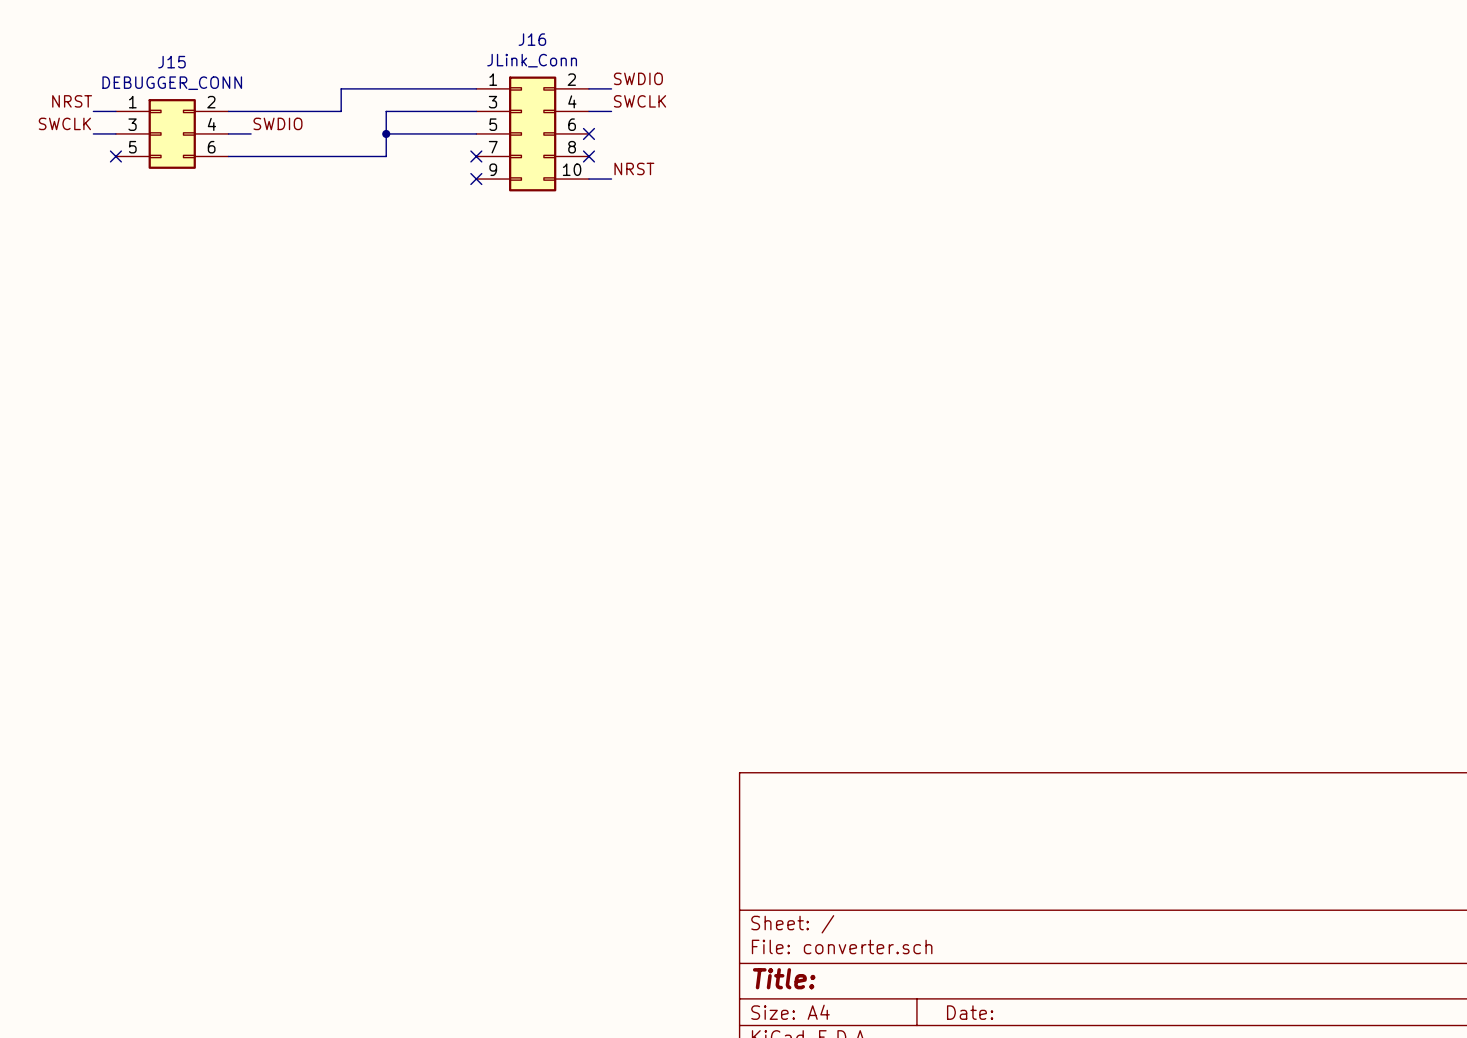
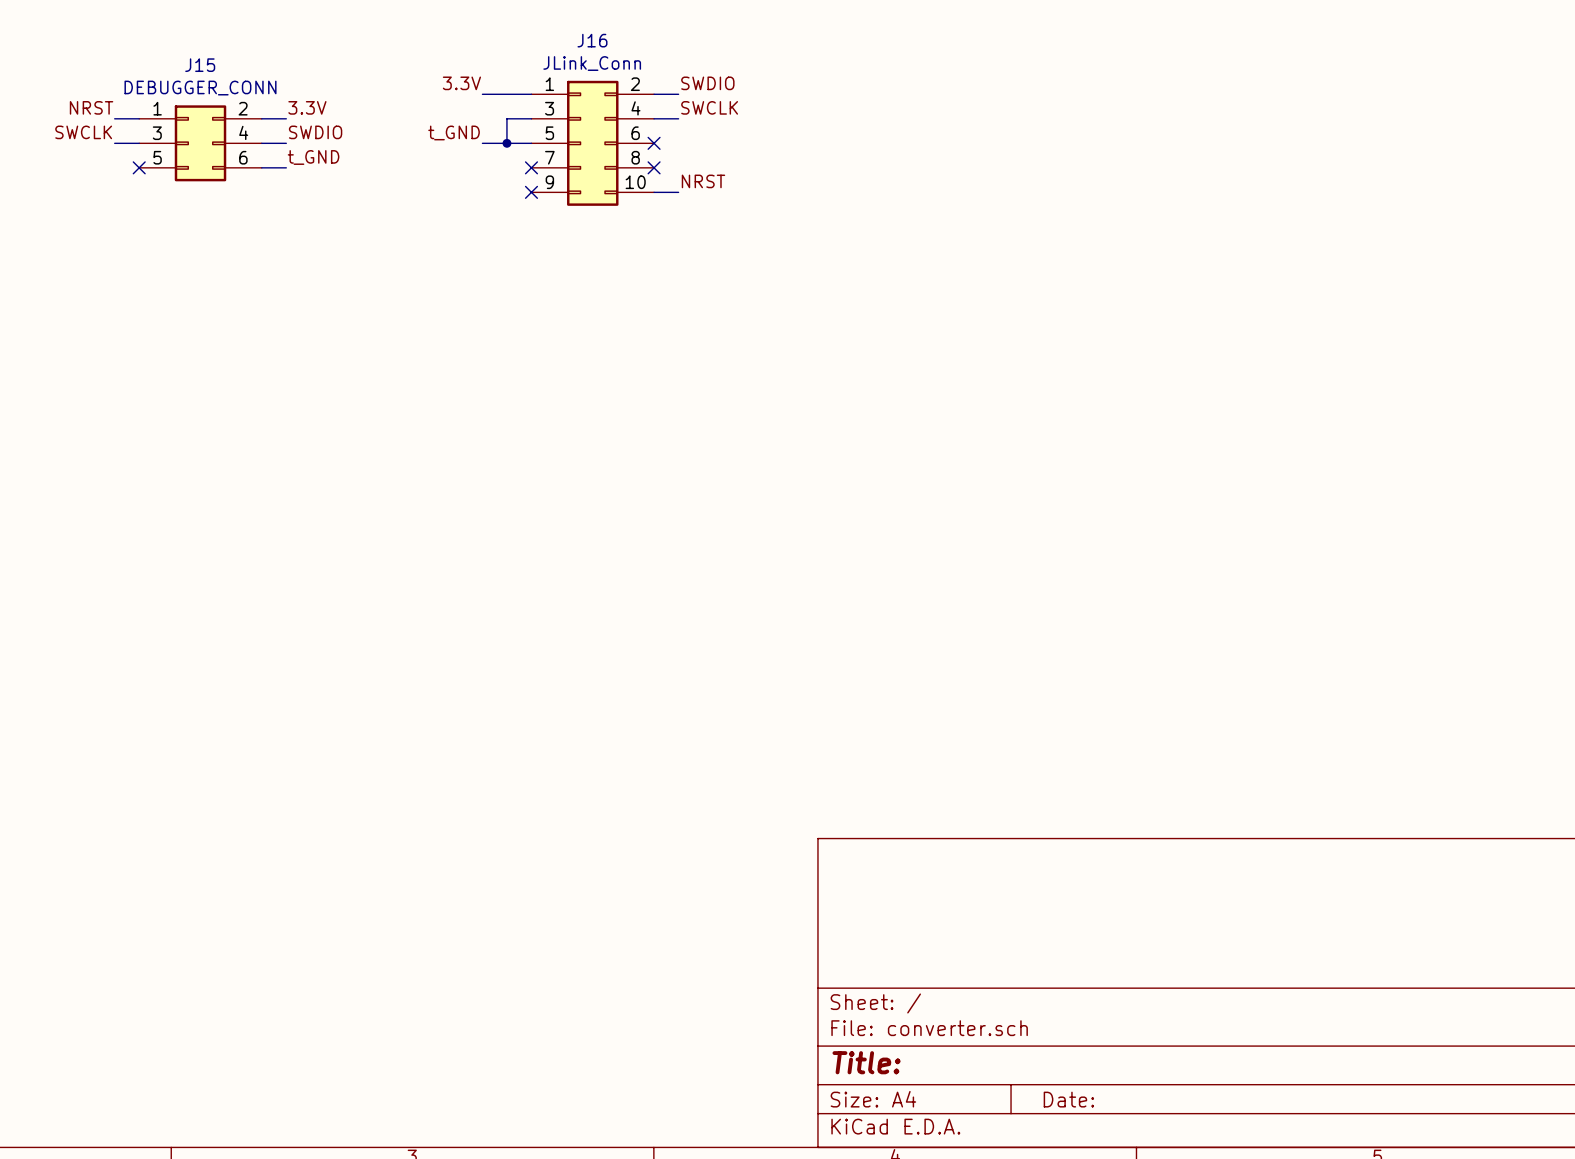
label: none -> 3.3V (461, 83)
wire: (431, 88) (341, 88) (341, 111) (251, 111) -> none
label: none -> 3.3V (307, 107)
wire: (453, 111) (386, 111) (386, 156) (251, 156) -> (506, 118) (506, 143)
label: none -> t_GND (454, 132)
wire: (386, 133) (431, 133) -> none
junction: (386, 133) -> none
junction: none -> (506, 143)
label: none -> t_GND (313, 157)

